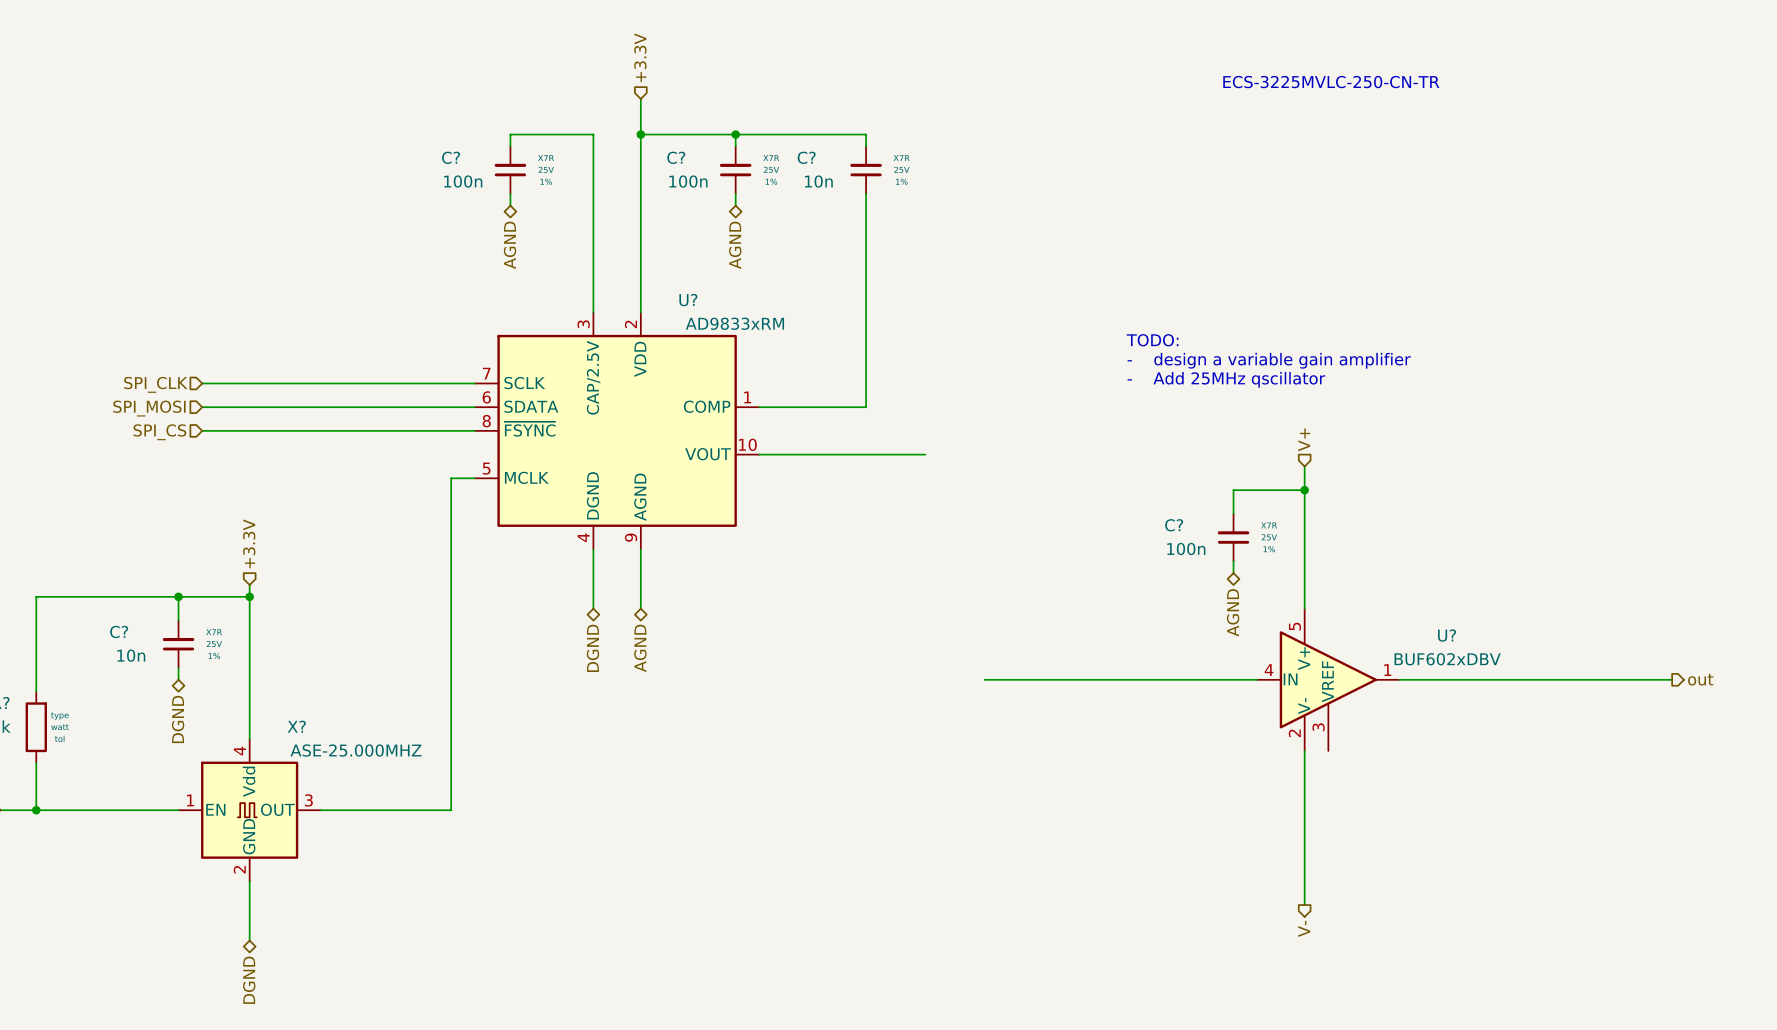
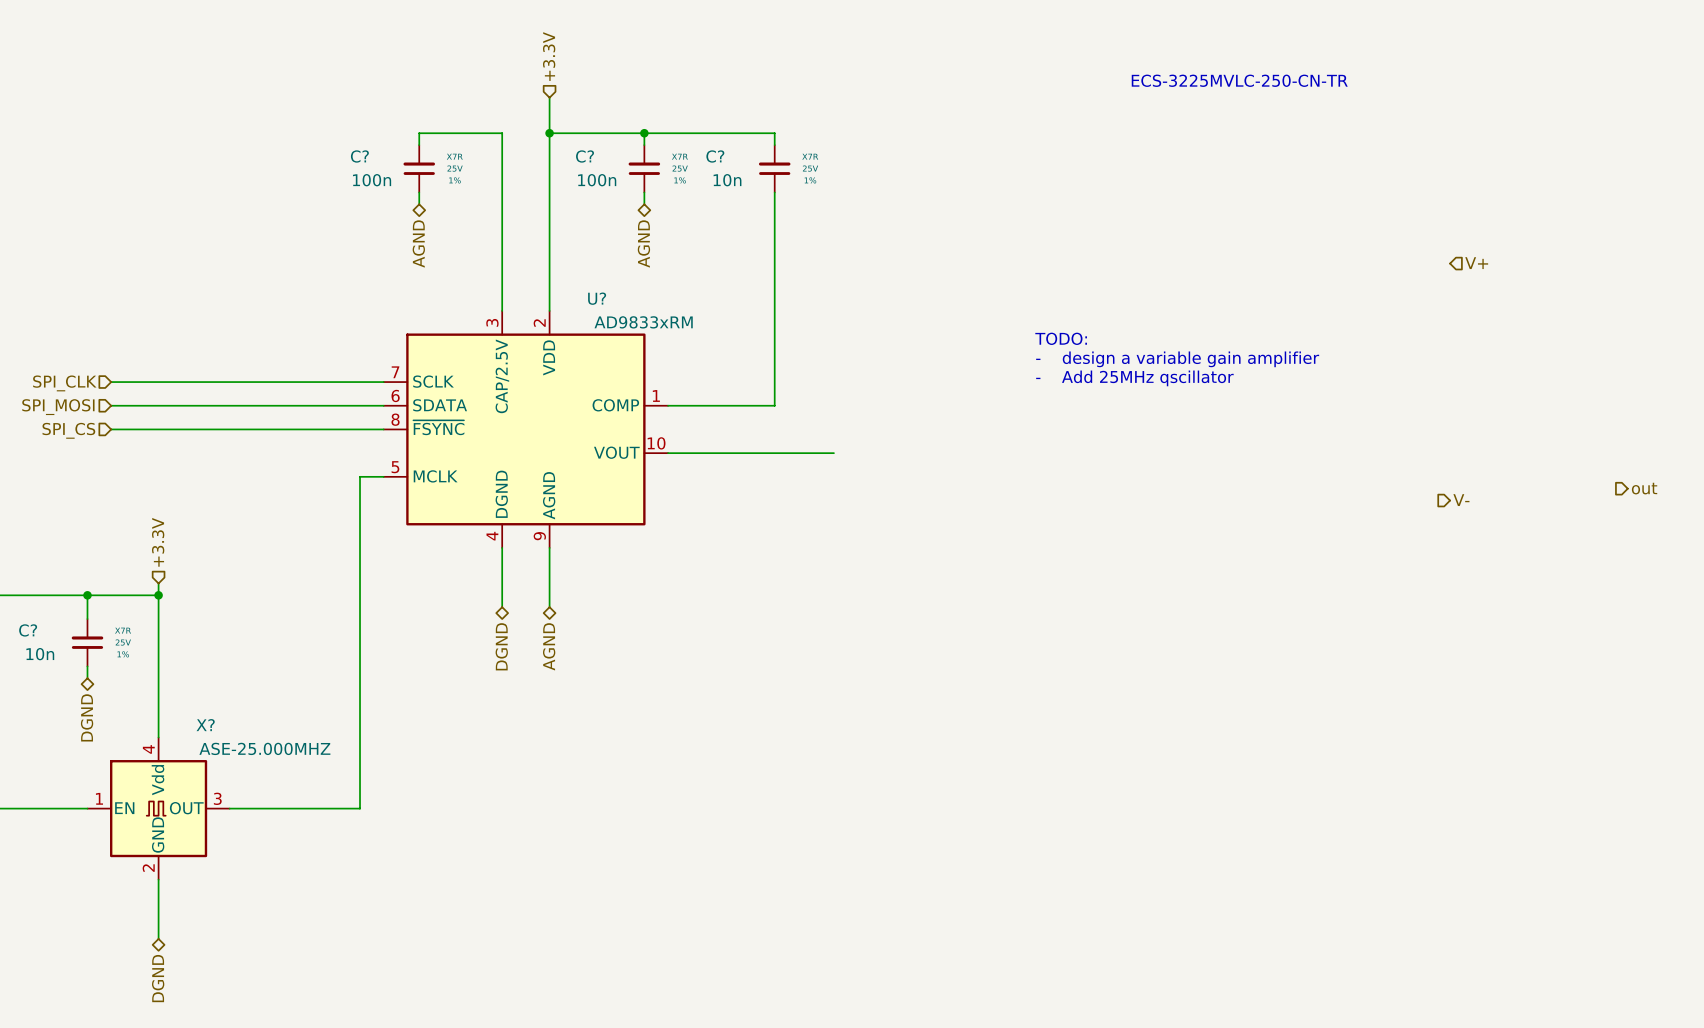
hierarchical label: none -> V+ (1476, 263)
hierarchical label: V+ (1304, 439) -> none
wire: (1304, 466) (1304, 608) -> none
wire: (1304, 490) (1233, 490) (1233, 513) -> none
junction: (1304, 490) -> none
hierarchical label: none -> V- (1461, 500)
C?: 100n (1233, 537) -> none
wire: (1233, 561) (1233, 573) -> none
hierarchical label: AGND (1233, 612) -> none
wire: (984, 679) (1257, 679) -> none
U?: BUF602xDBV (1328, 679) -> none
wire: (1399, 679) (1672, 679) -> none
hierarchical label position: out (1700, 679) -> out (1644, 488)
wire: (1304, 750) (1304, 905) -> none
hierarchical label: V- (1304, 928) -> none

